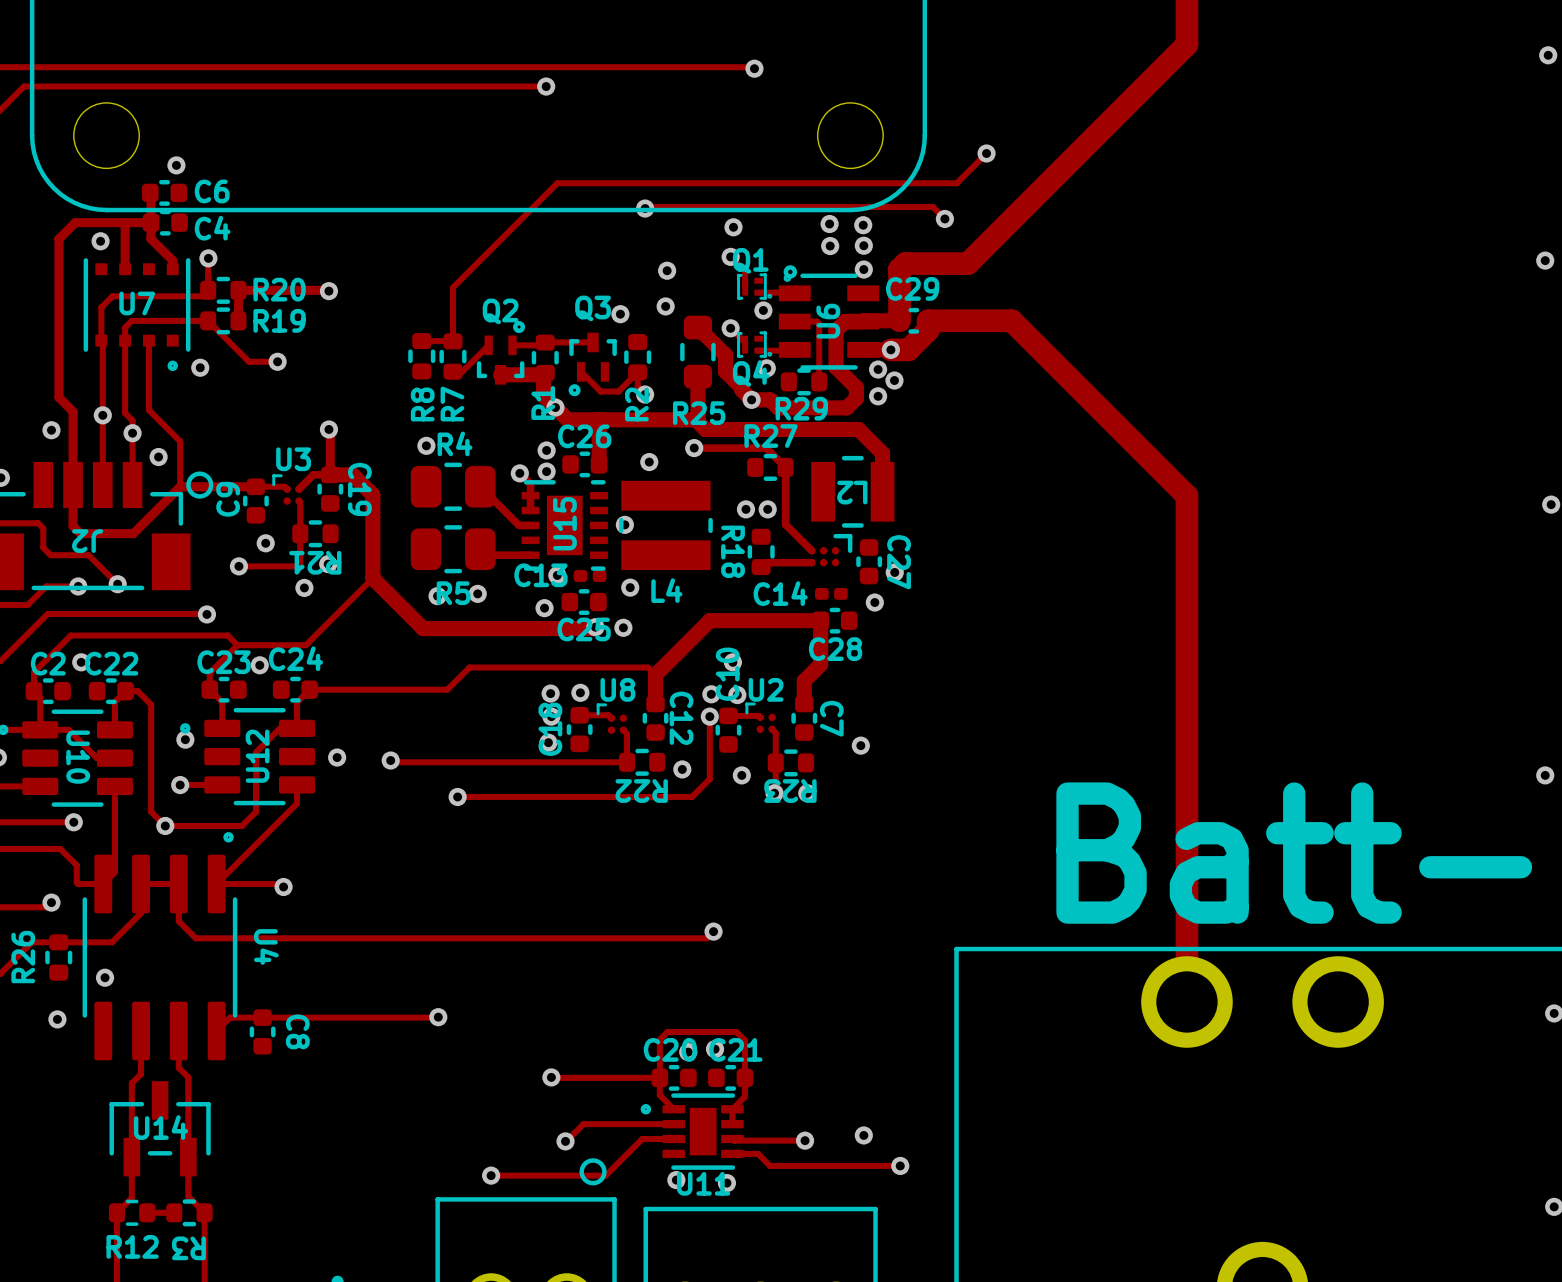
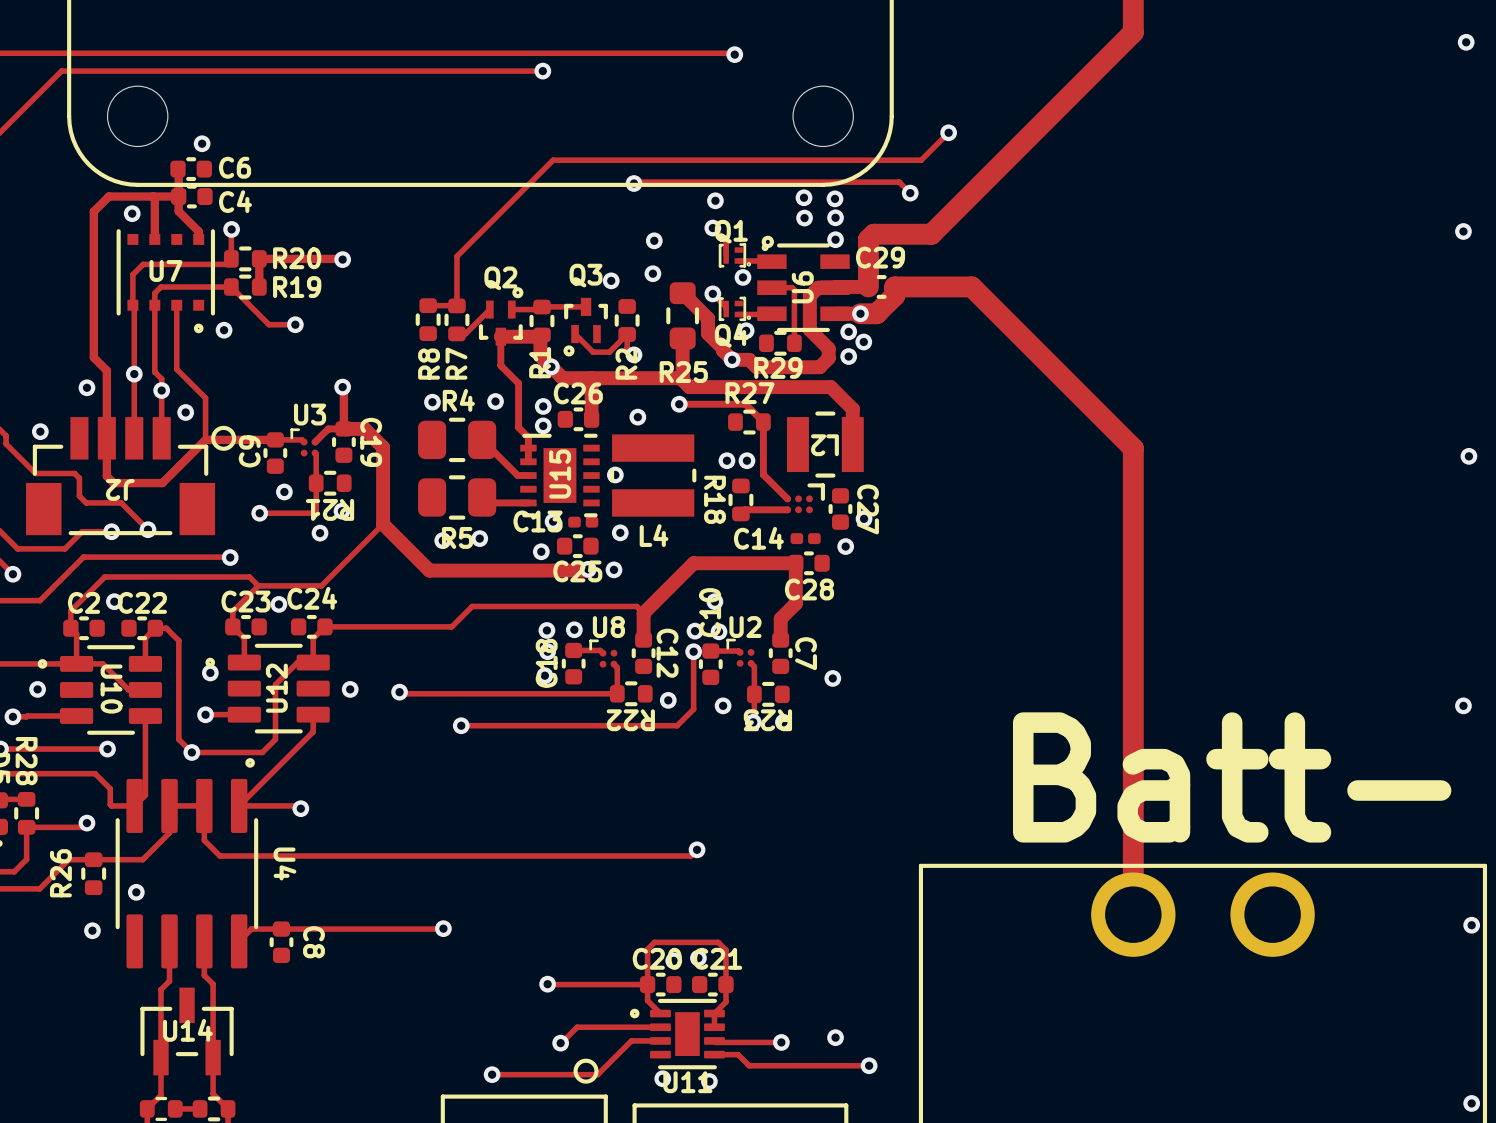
track: none -> (500, 336) (500, 365) (518, 383) (518, 427)
via position: (519, 473) -> (495, 401)

